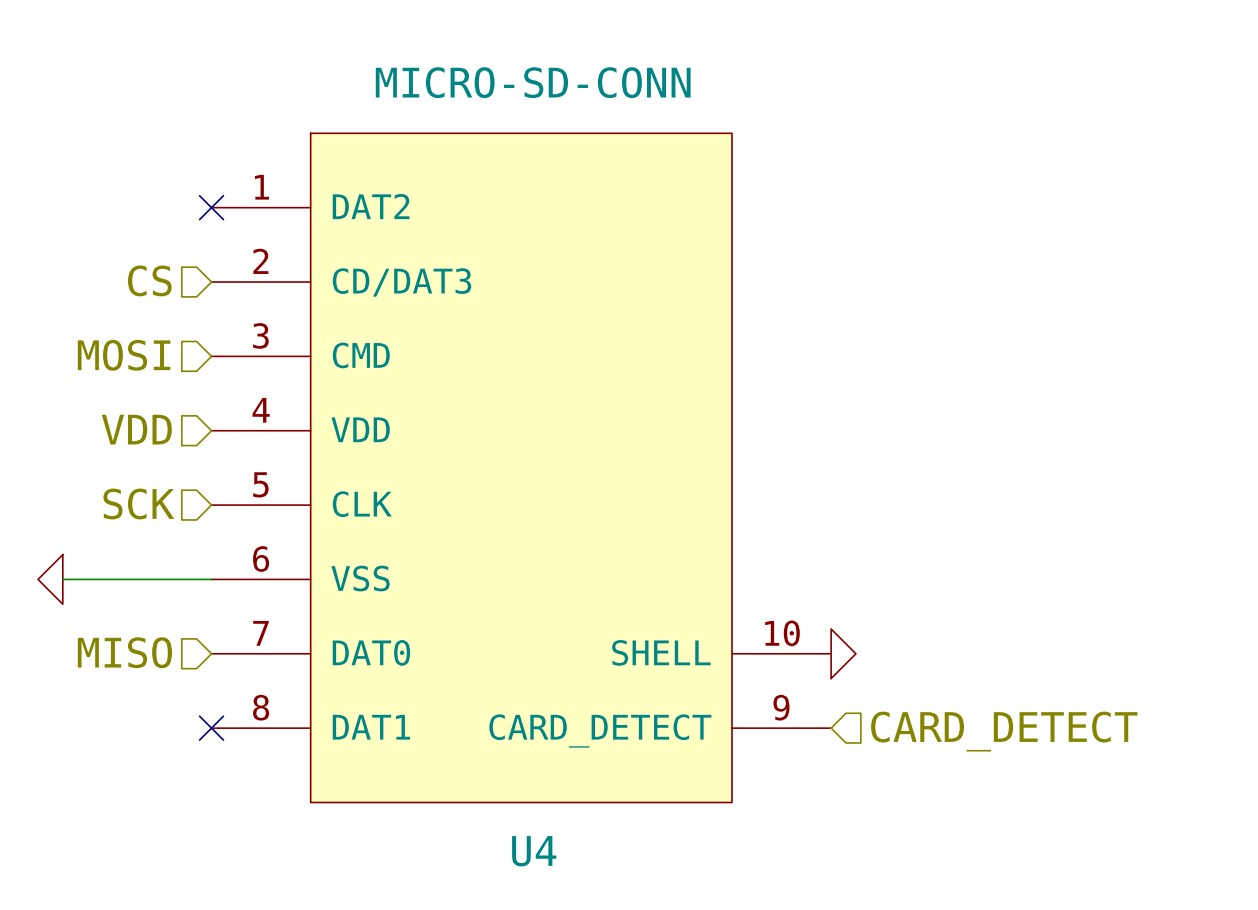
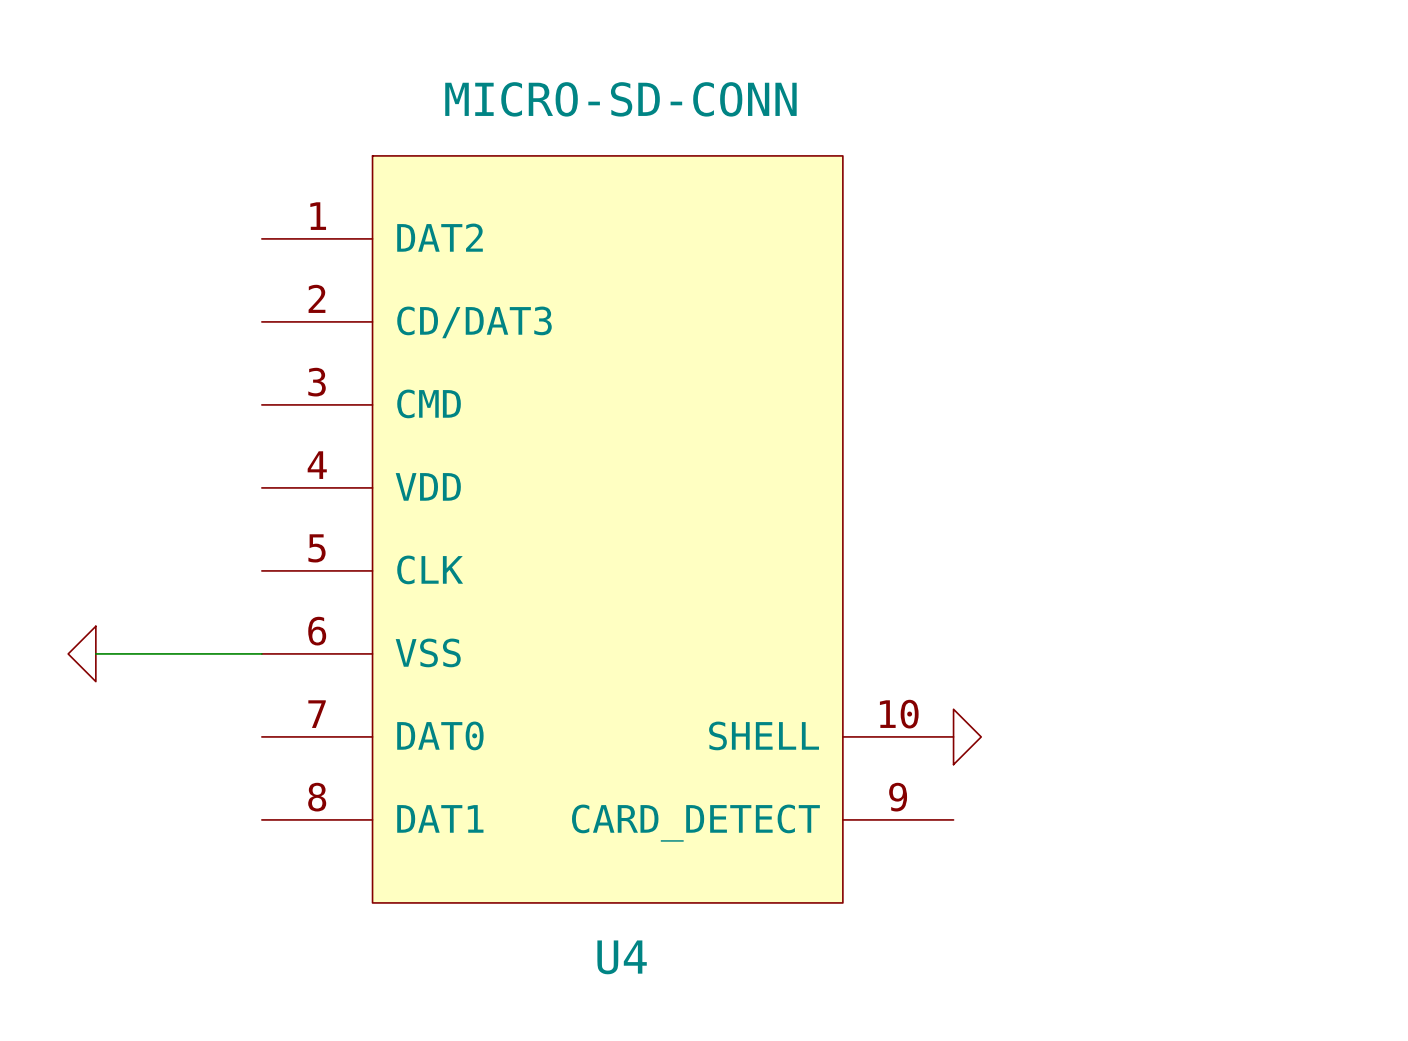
no-connect mark: (211, 207) -> none
hierarchical label: CS (149, 280) -> none
hierarchical label: MOSI (124, 355) -> none
hierarchical label: VDD (136, 429) -> none
hierarchical label: SCK (138, 503) -> none
hierarchical label: MISO (124, 652) -> none
no-connect mark: (211, 728) -> none
hierarchical label: CARD_DETECT (1004, 731) -> none

